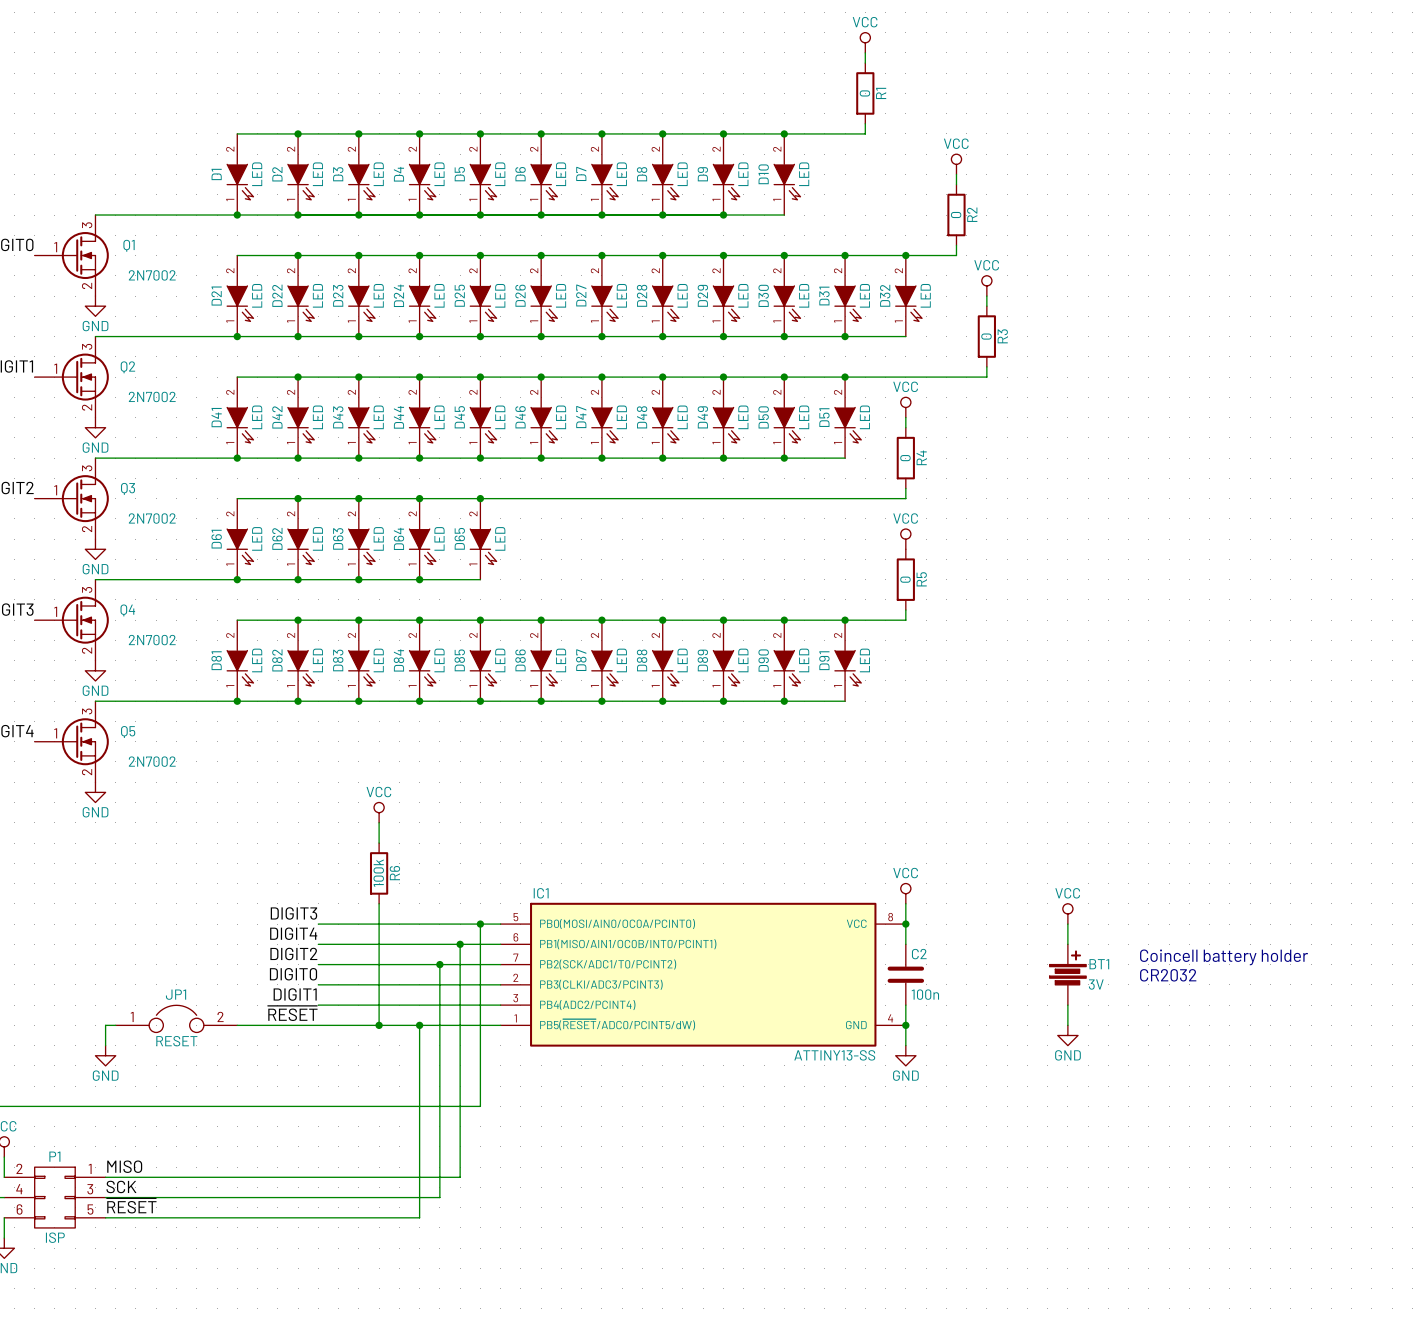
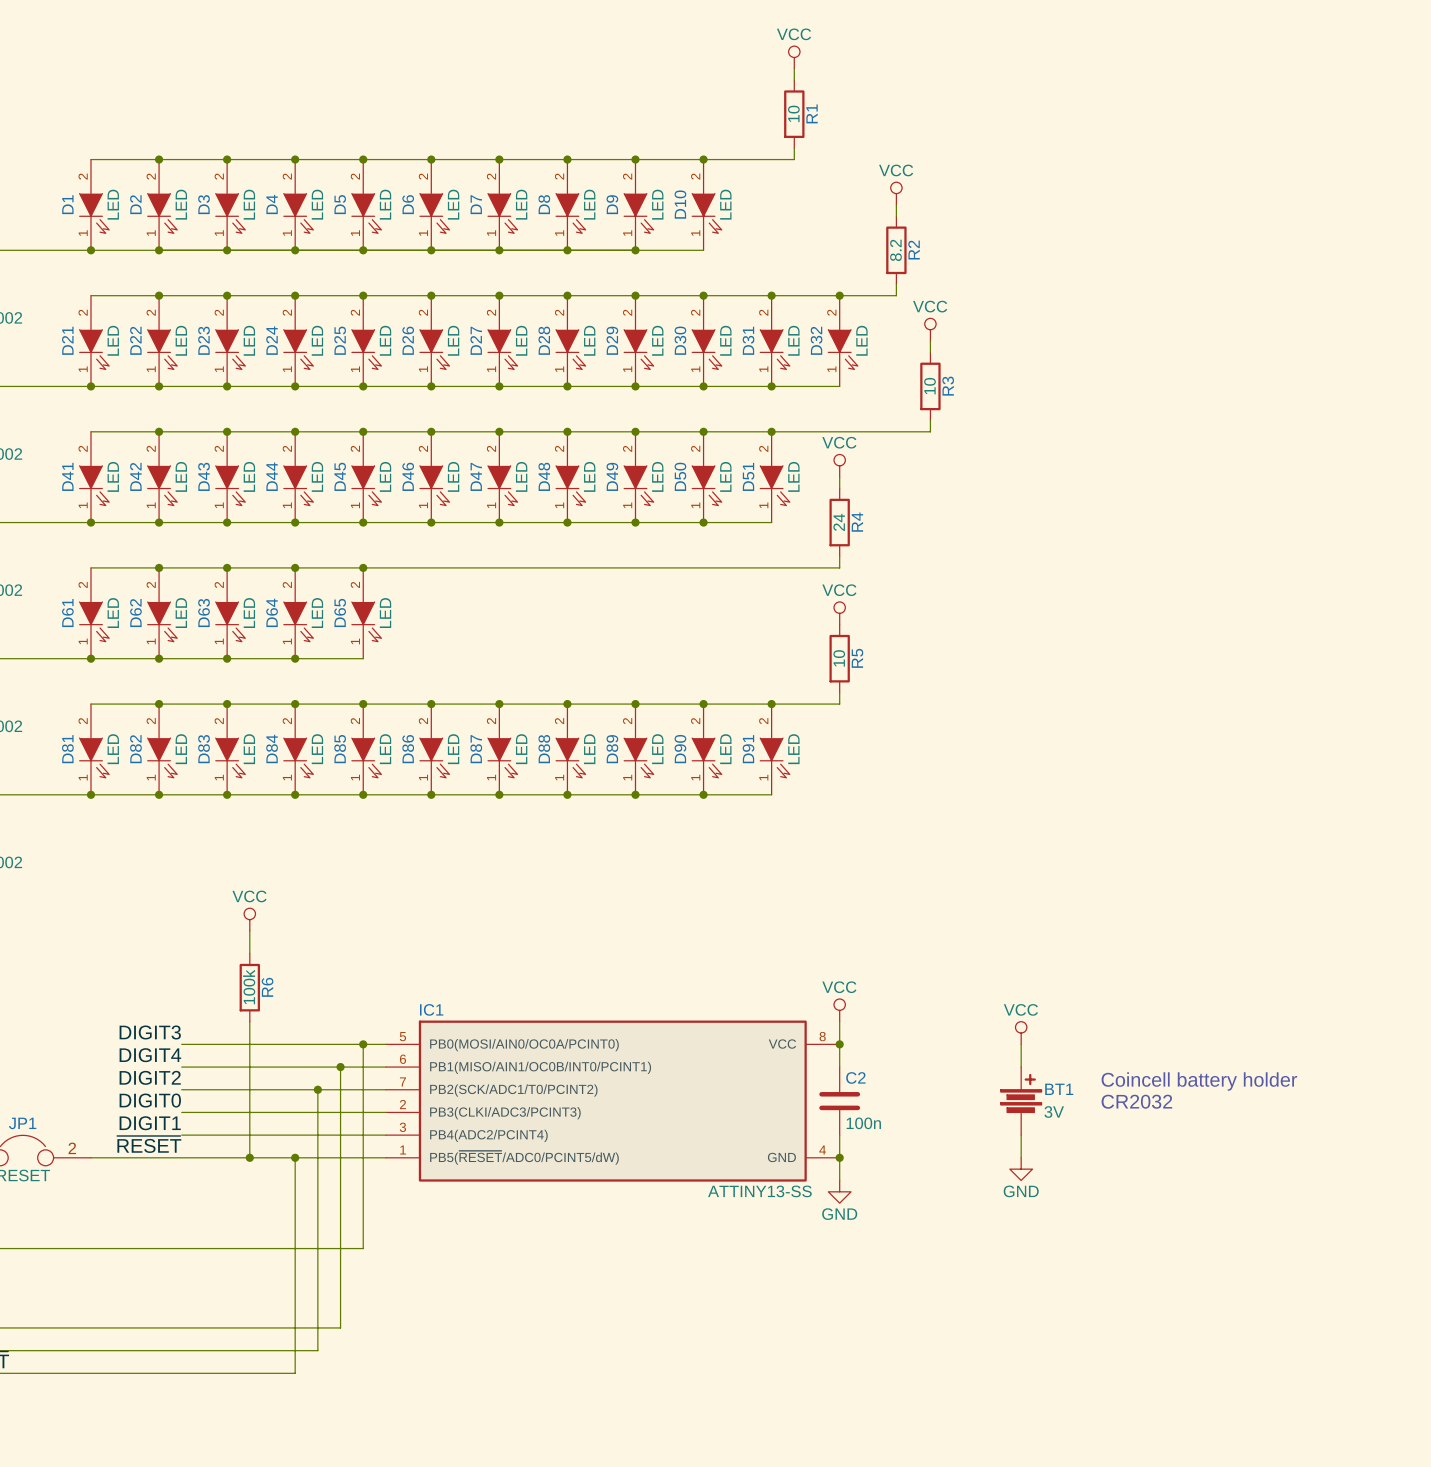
R1 value: 0 (864, 93) -> 10 (793, 113)
R2 value: 0 (956, 215) -> 8.2 (895, 250)
R3 value: 0 (986, 336) -> 10 (930, 386)
R4 value: 0 (905, 458) -> 24 (839, 522)
R5 value: 0 (905, 579) -> 10 (839, 658)

